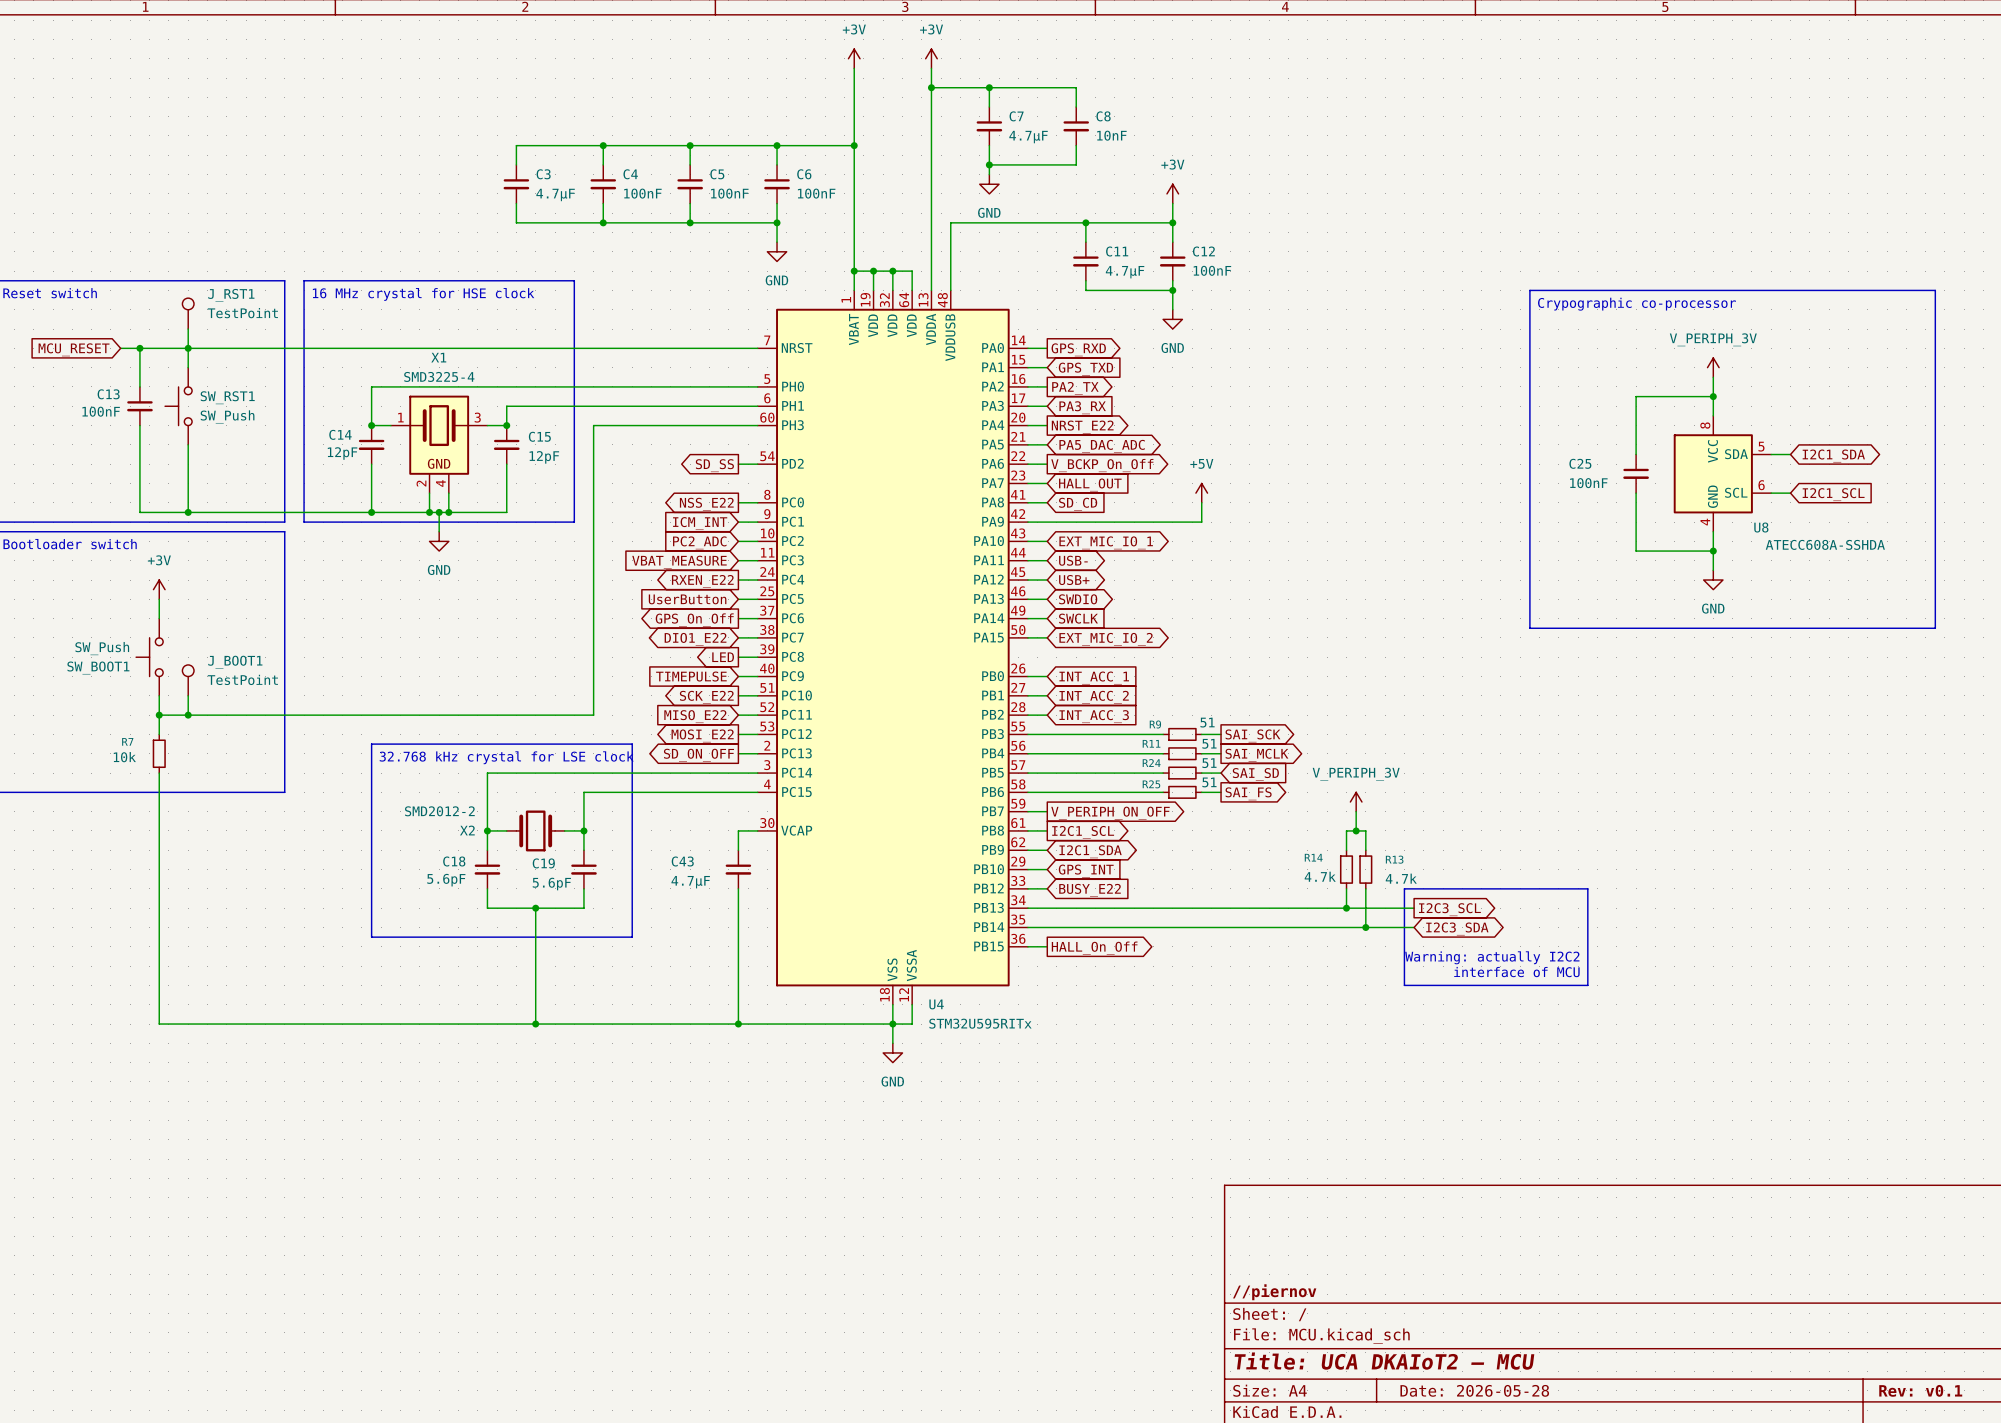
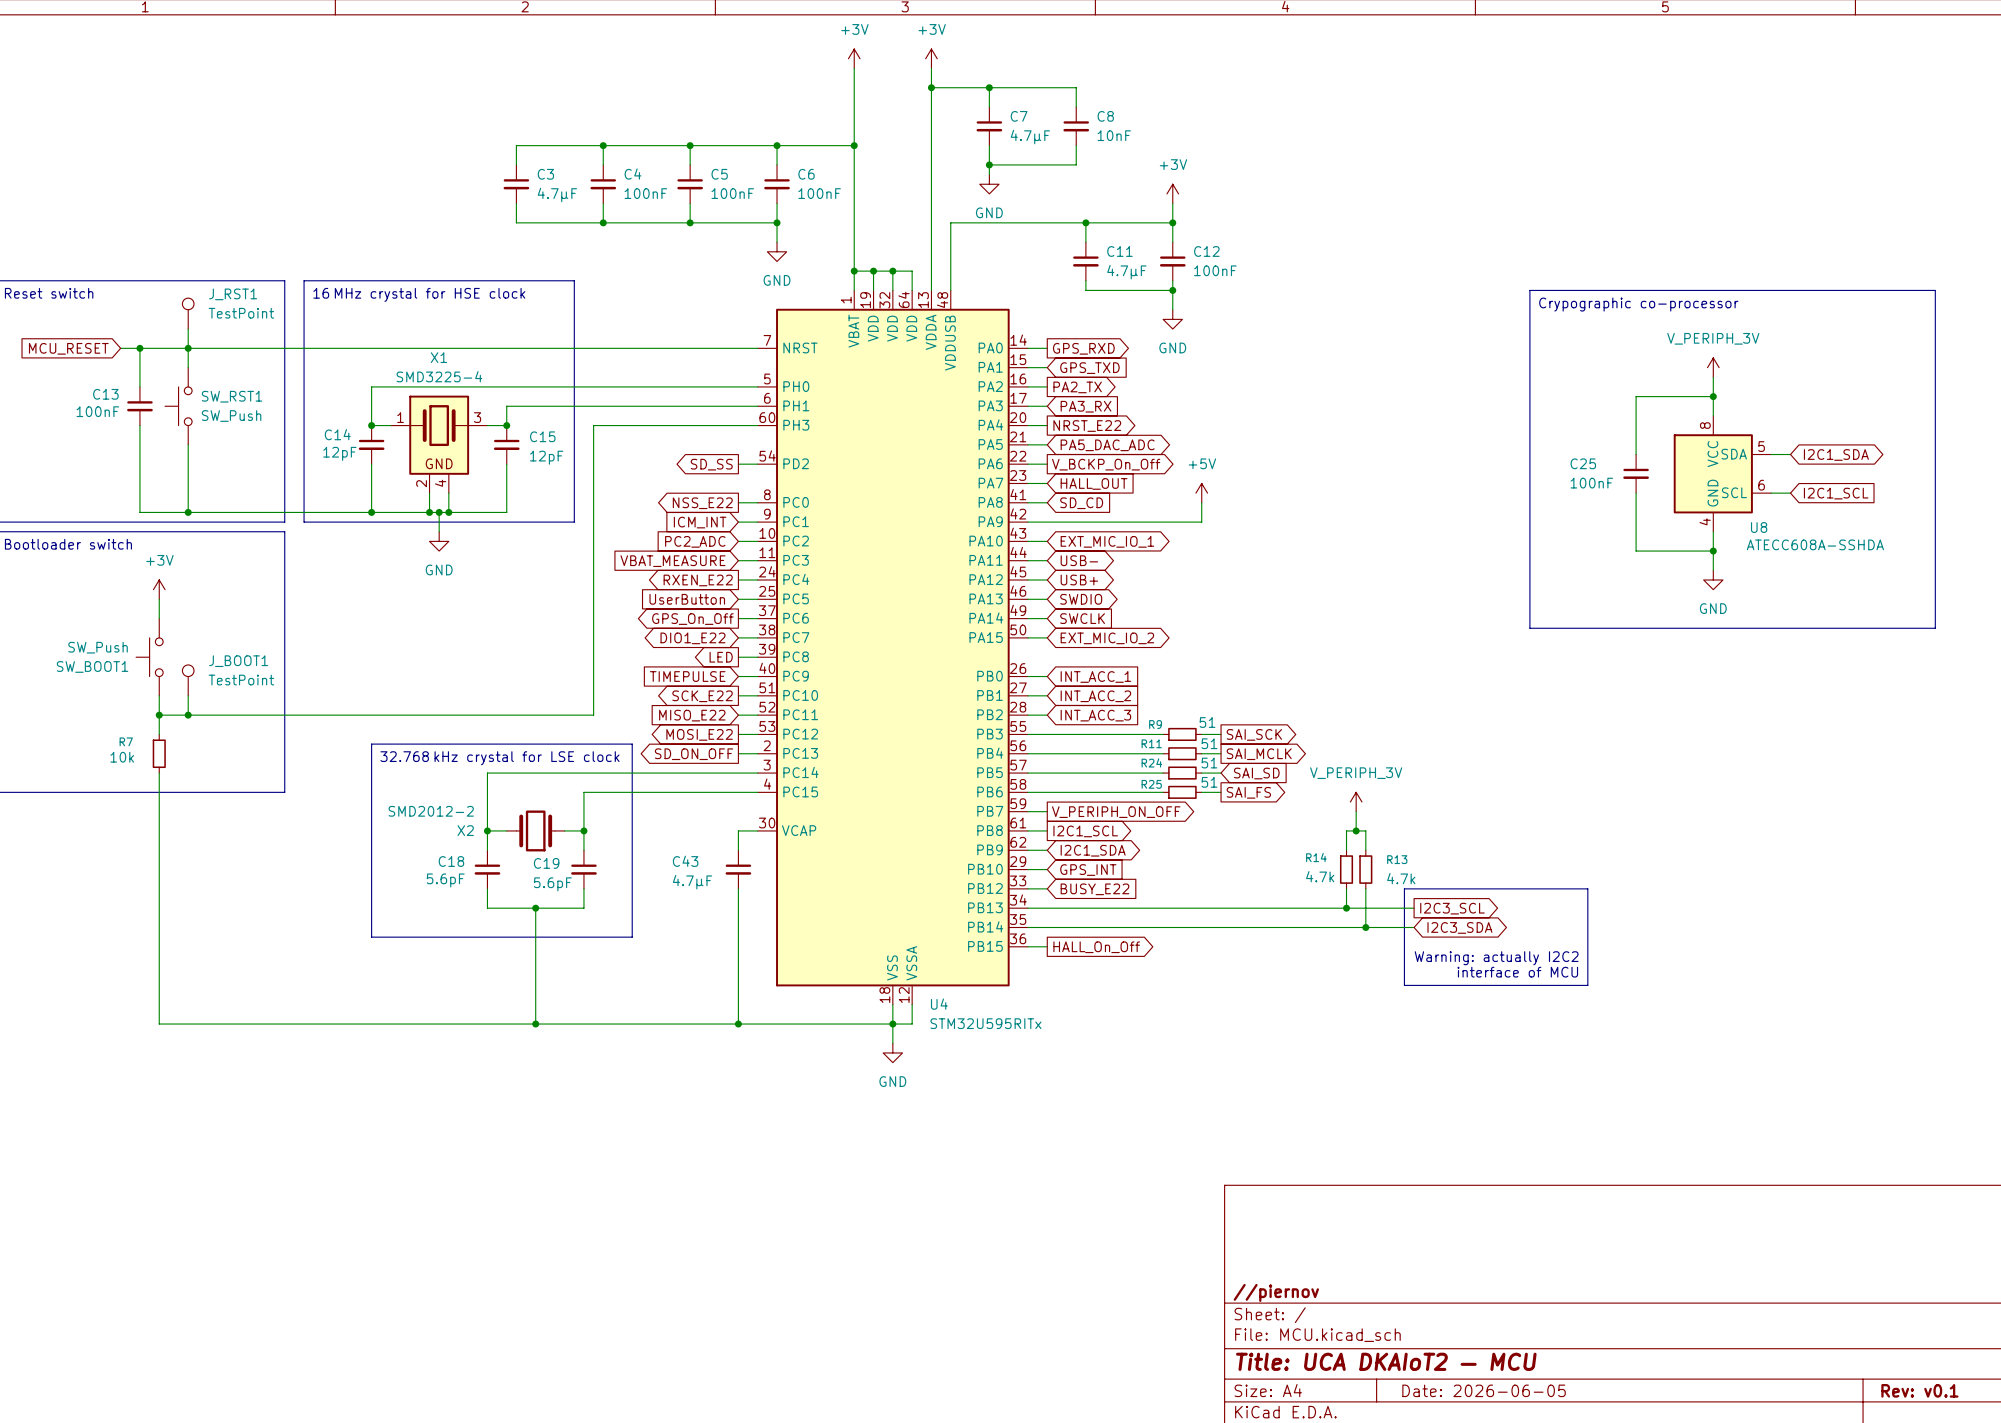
title block: Date: 2026-05-28 (1474, 1390) -> Date: 2026-06-05 (1484, 1390)

